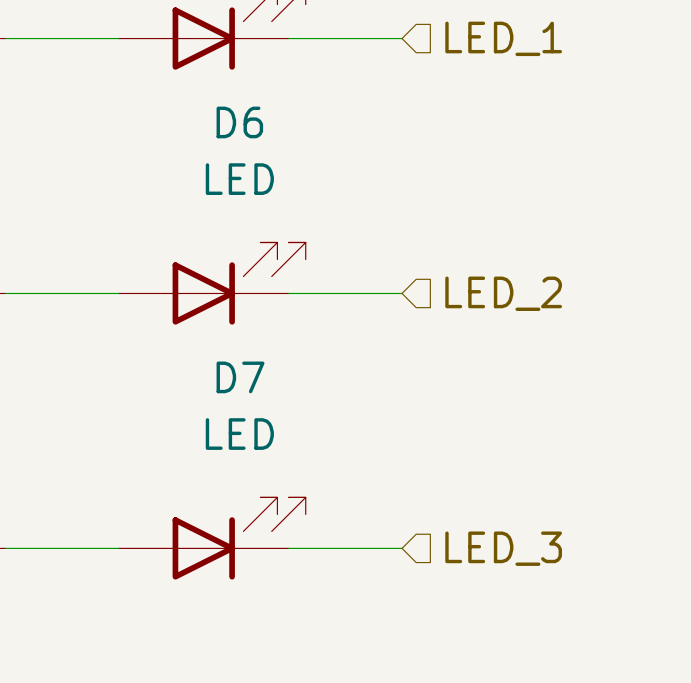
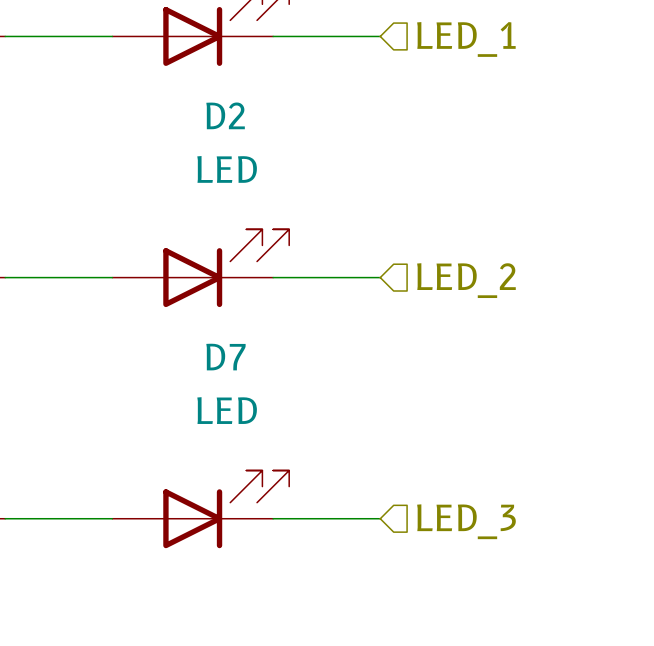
D6 name: D6 (239, 122) -> D2 (225, 115)

